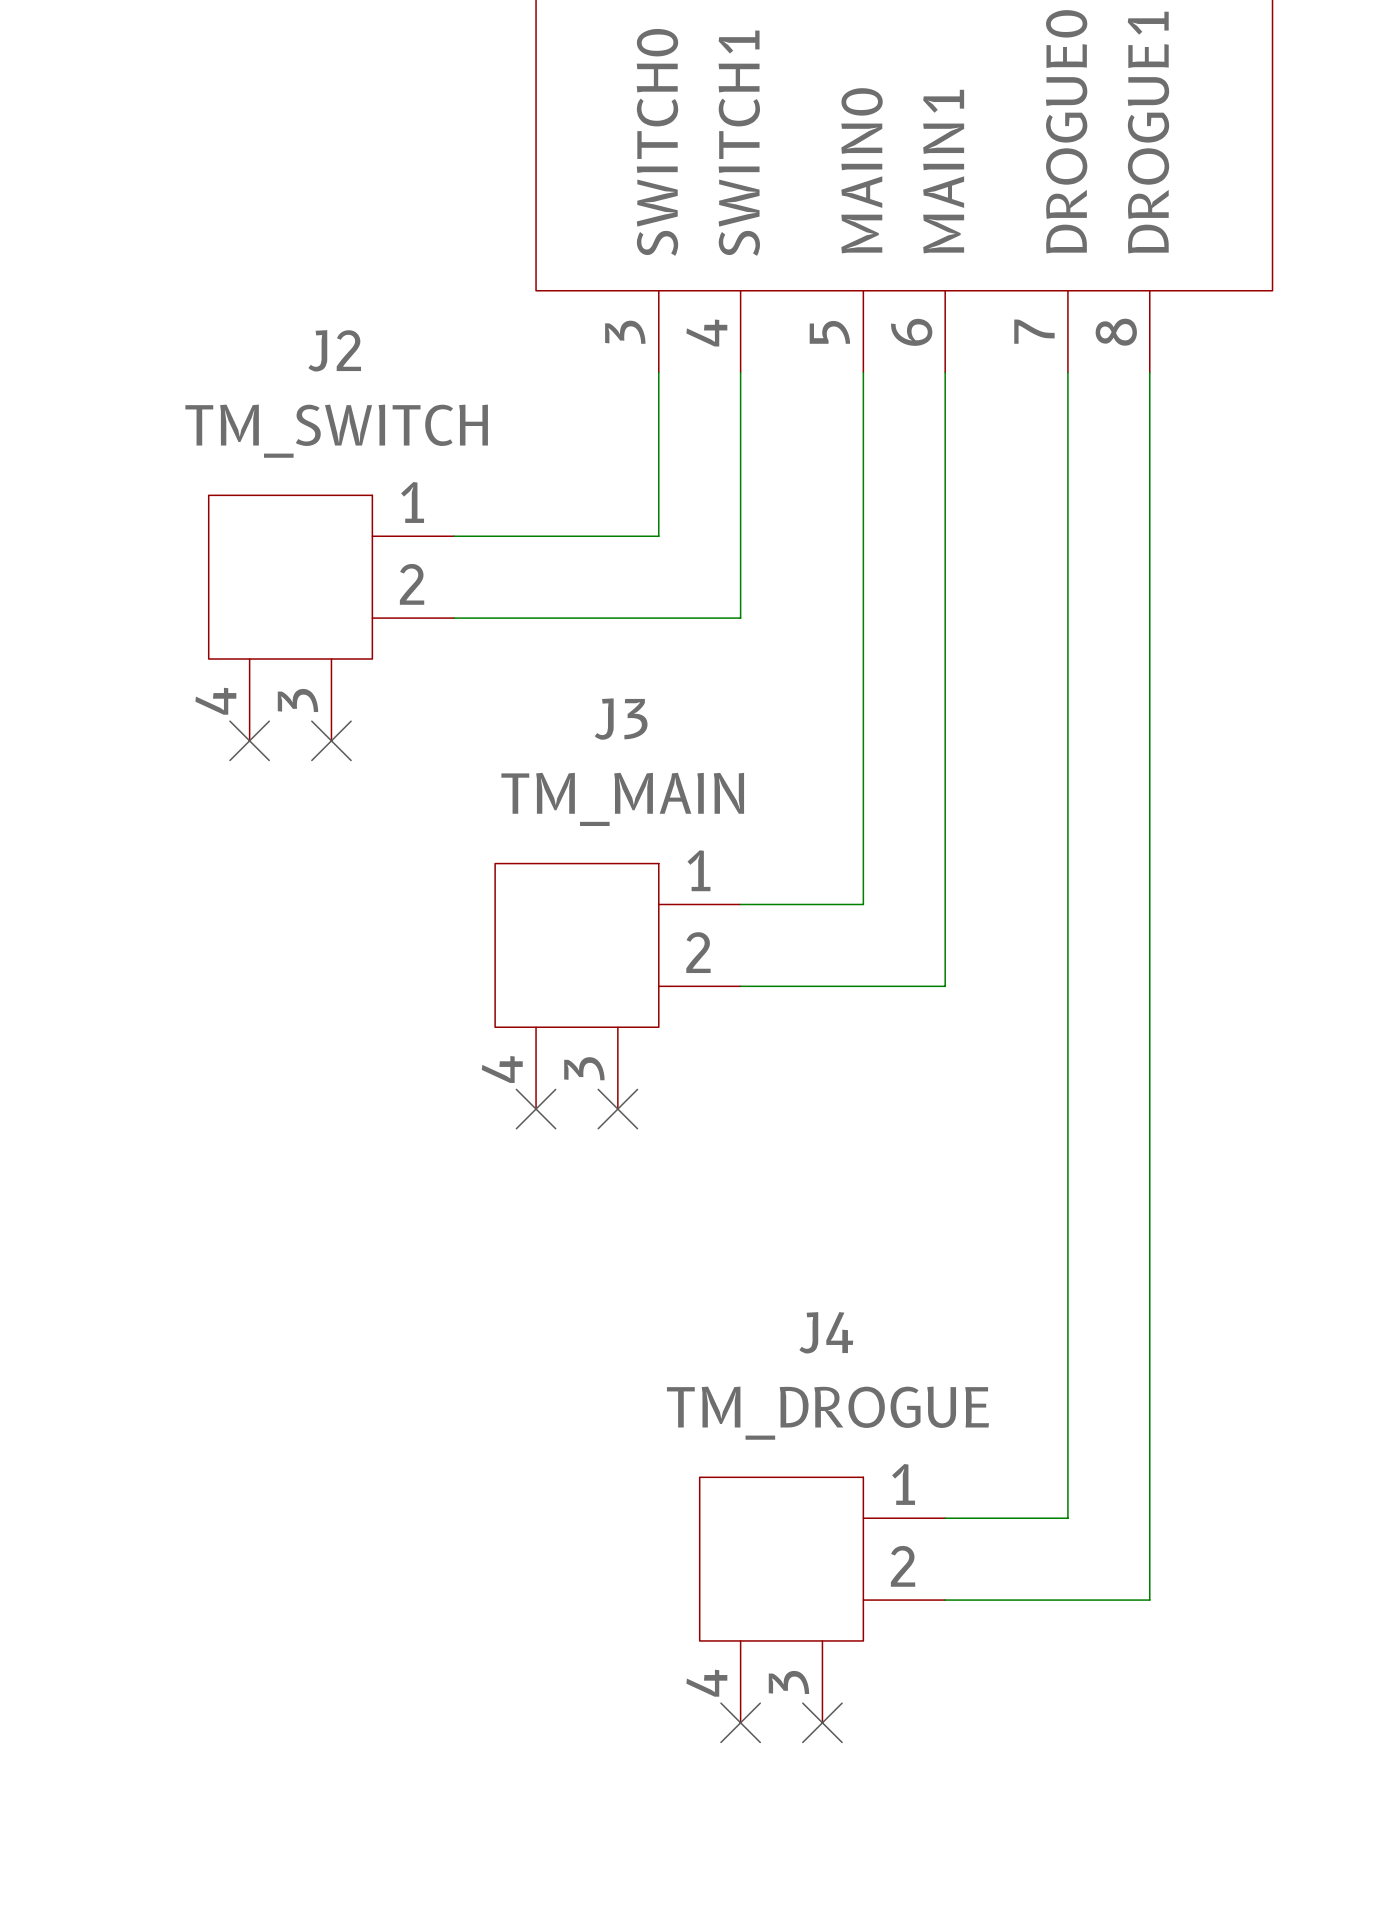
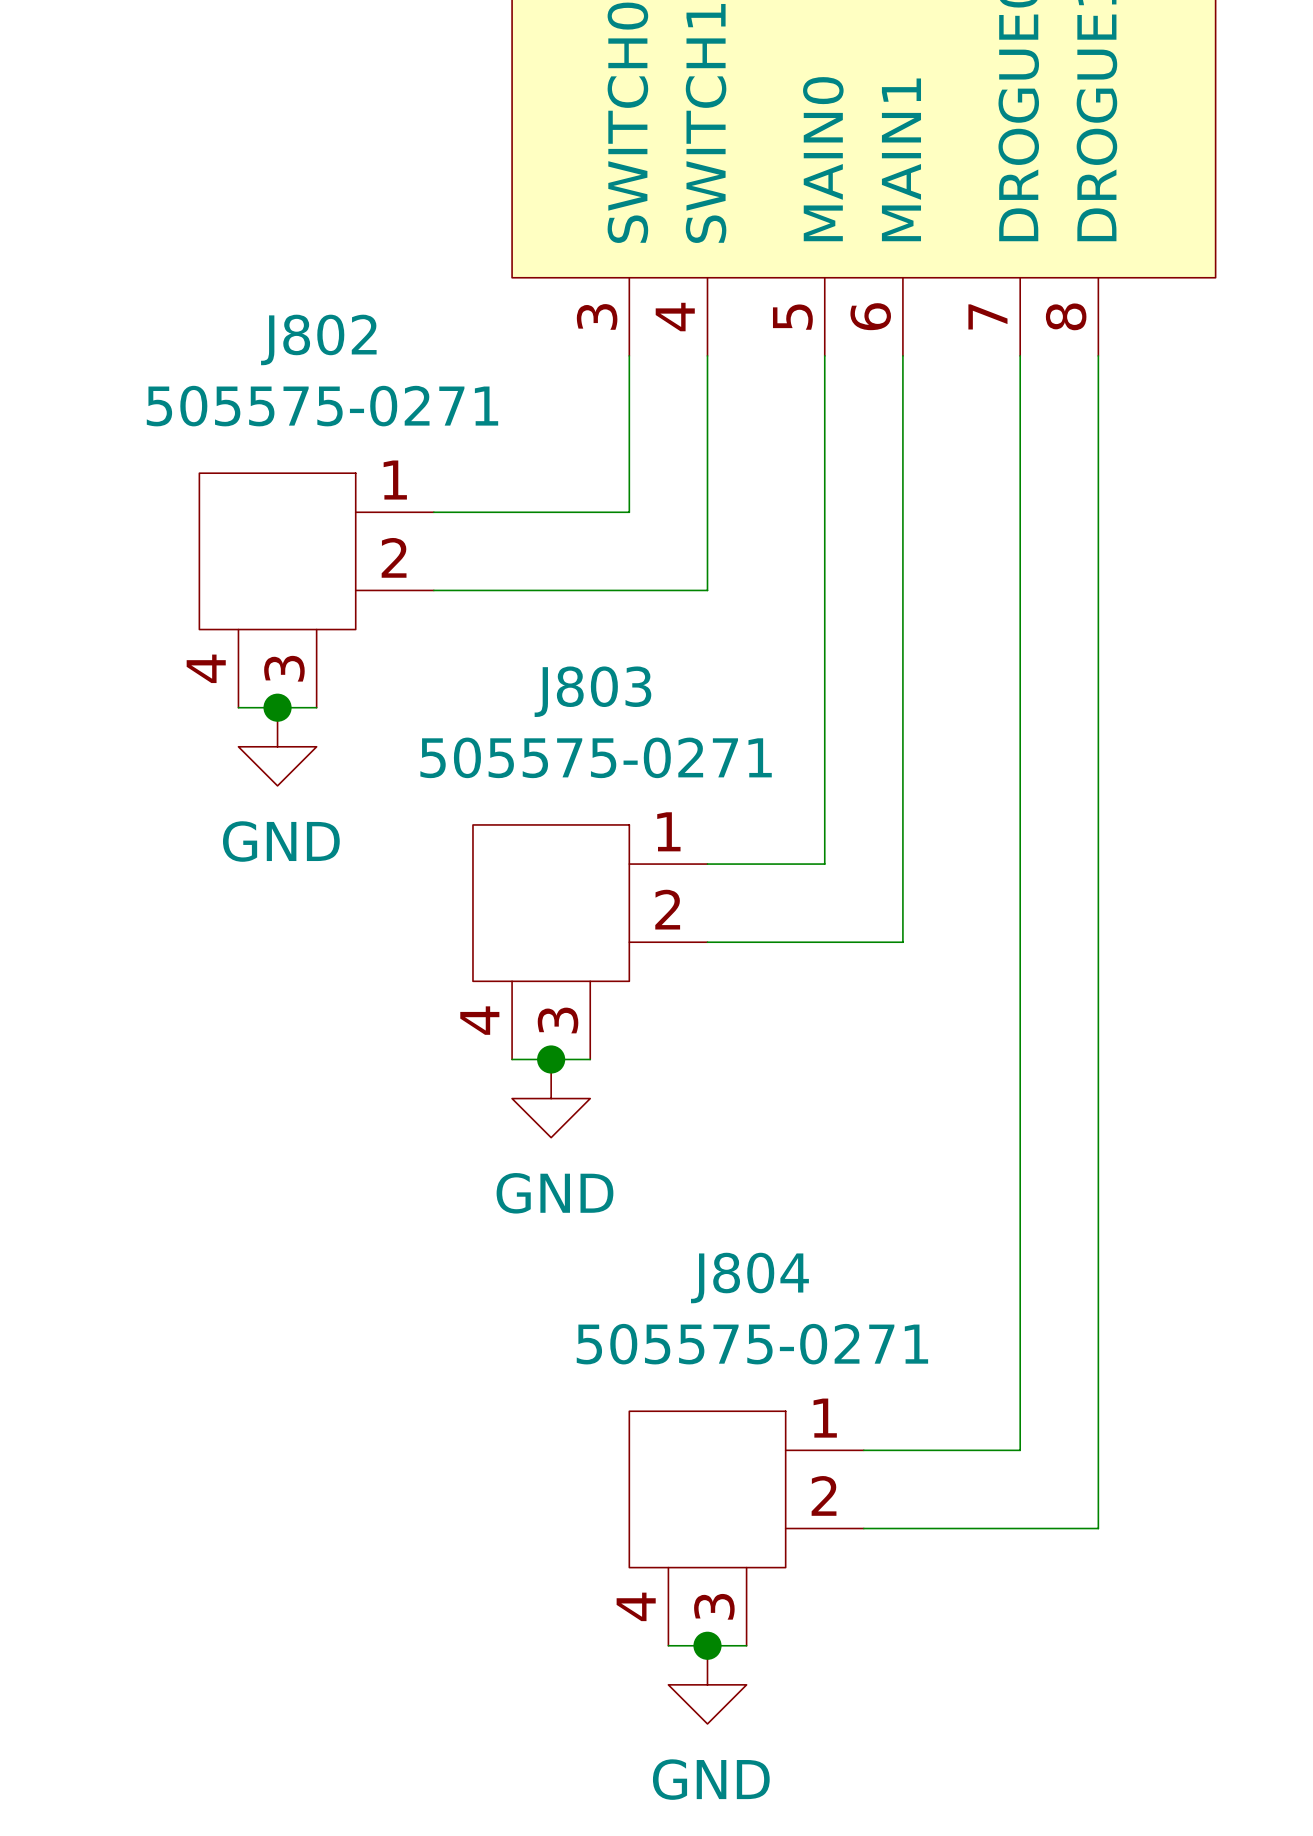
J2 name: J2 (334, 350) -> J802 (318, 339)
J2 value: TM_SWITCH (336, 431) -> 505575-0271 (322, 406)
J3 name: J3 (621, 719) -> J803 (592, 691)
wire: none -> (238, 707) (316, 707)
no-connect mark: (249, 740) -> none
junction: none -> (277, 707)
no-connect mark: (331, 740) -> none
power symbol: none -> GND (277, 746)
J3 value: TM_MAIN (622, 799) -> 505575-0271 (596, 757)
wire: none -> (512, 1059) (590, 1059)
no-connect mark: (536, 1109) -> none
junction: none -> (551, 1059)
no-connect mark: (617, 1109) -> none
power symbol: none -> GND (551, 1098)
J804: none -> 505575-0271 (746, 1528)
J4: TM_DROGUE (822, 1600) -> none
wire: none -> (668, 1645) (746, 1645)
no-connect mark: (740, 1722) -> none
junction: none -> (707, 1645)
no-connect mark: (822, 1722) -> none
power symbol: none -> GND (707, 1684)

